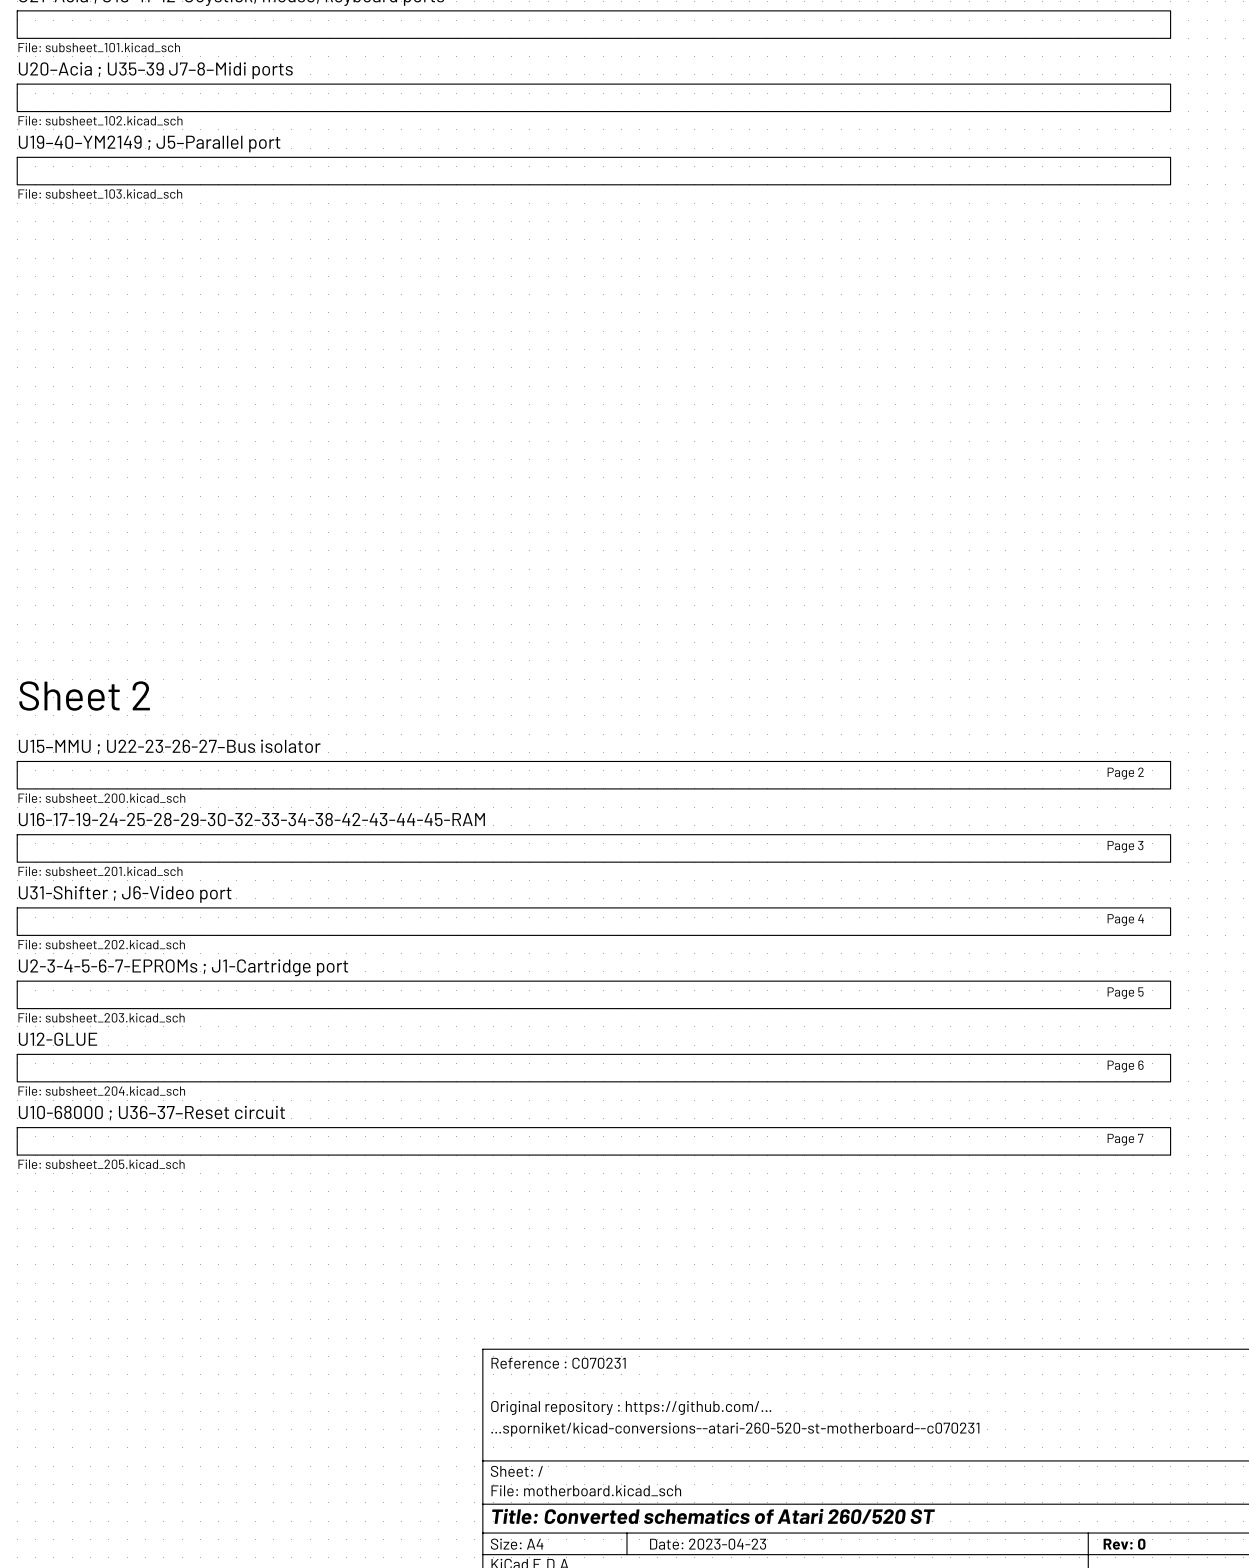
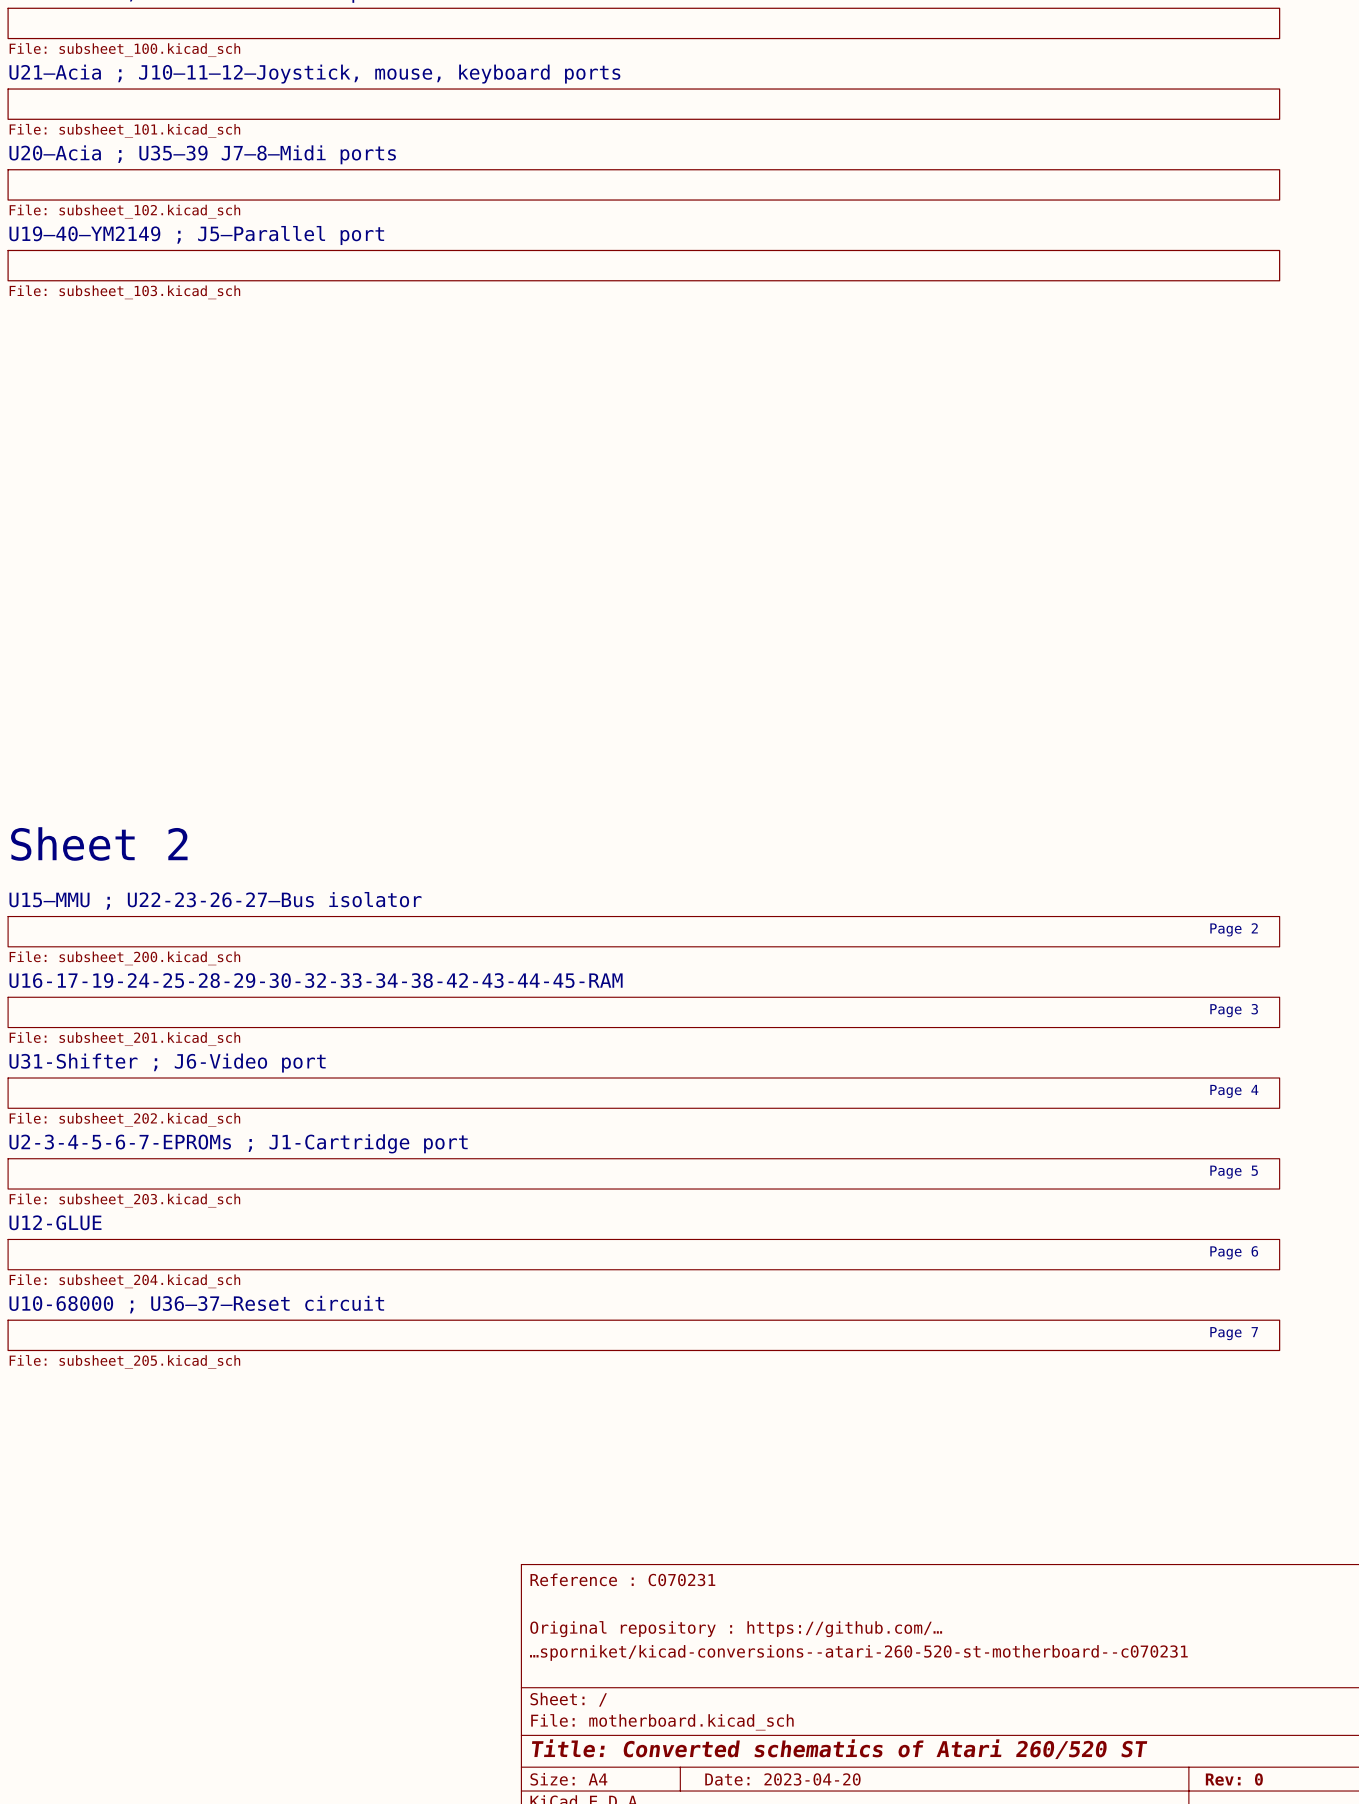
title block: Date: 2023-04-23 (708, 1544) -> Date: 2023-04-20 (782, 1779)

